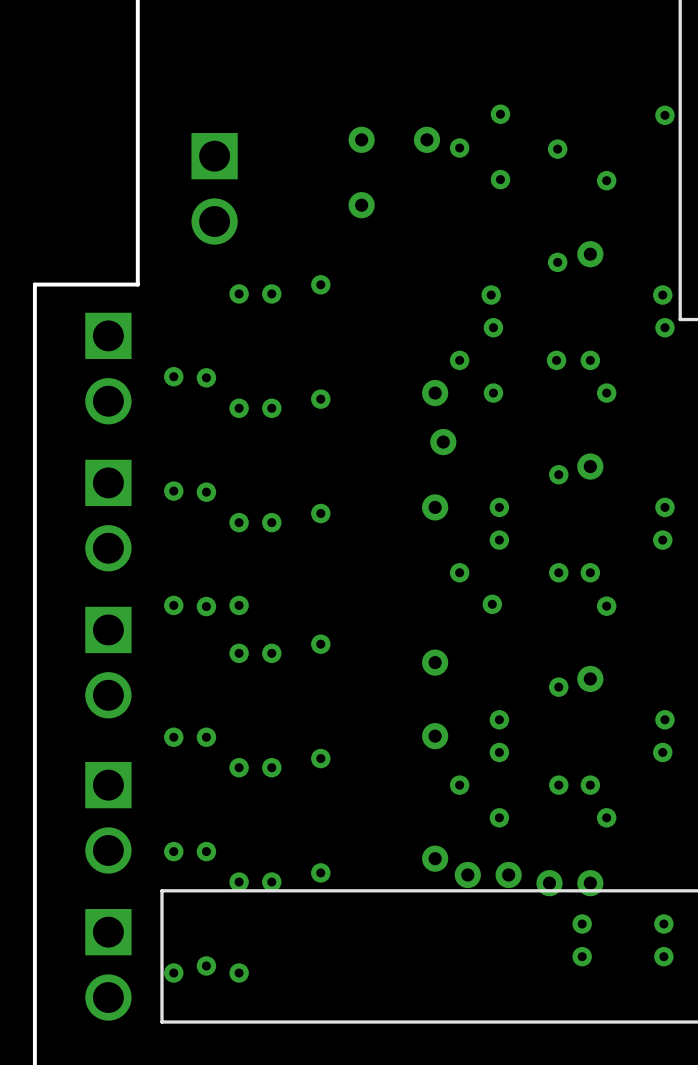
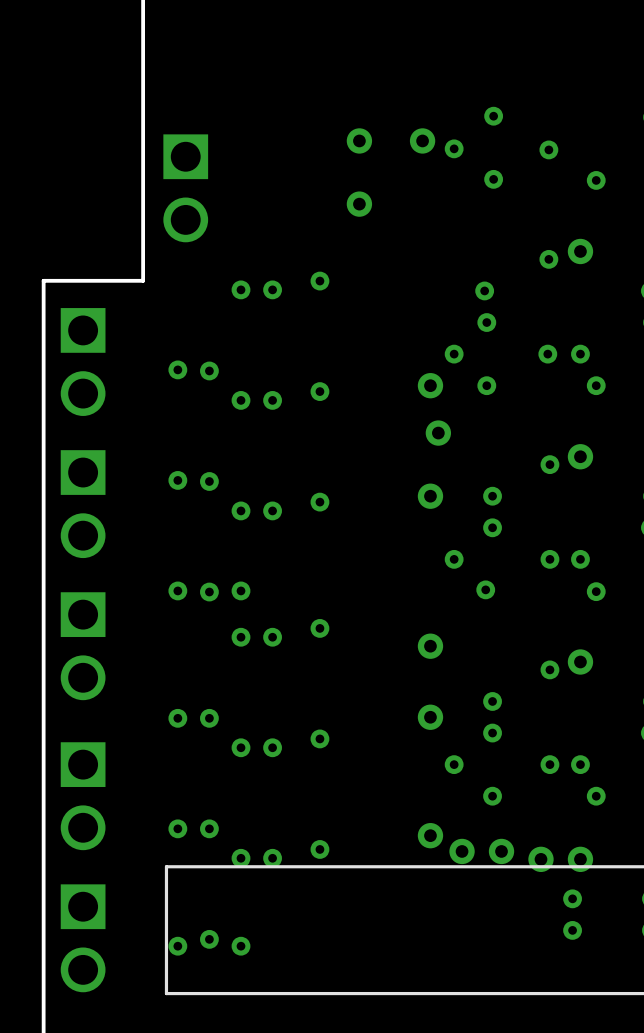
part position: (214, 188) -> (185, 188)
part position: (108, 368) -> (83, 362)
part position: (108, 515) -> (83, 504)
part position: (108, 662) -> (83, 646)
part position: (108, 817) -> (83, 796)
part position: (108, 964) -> (83, 938)

